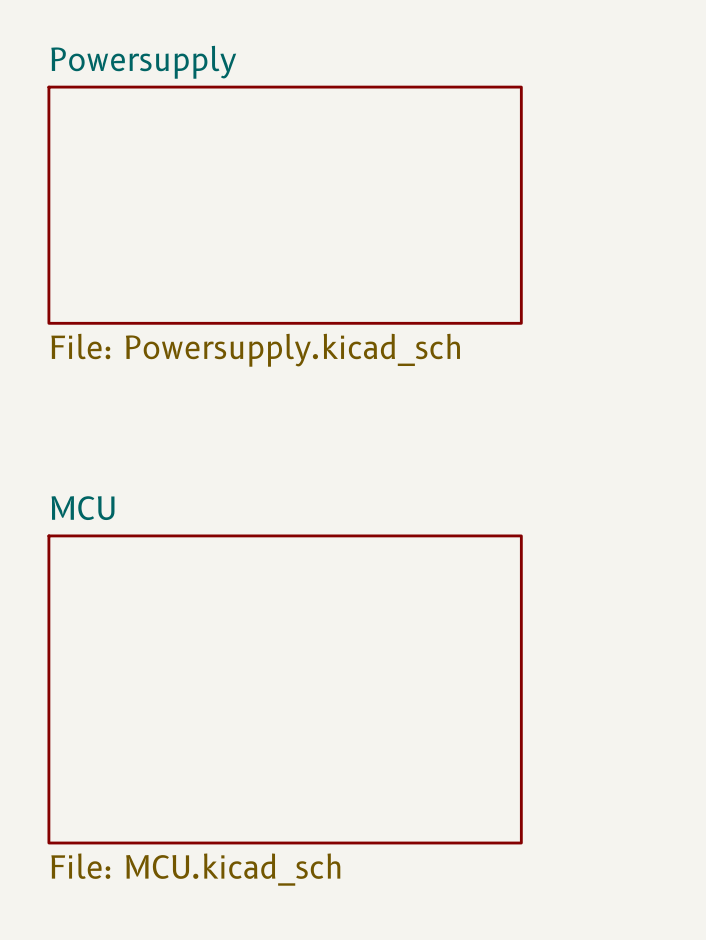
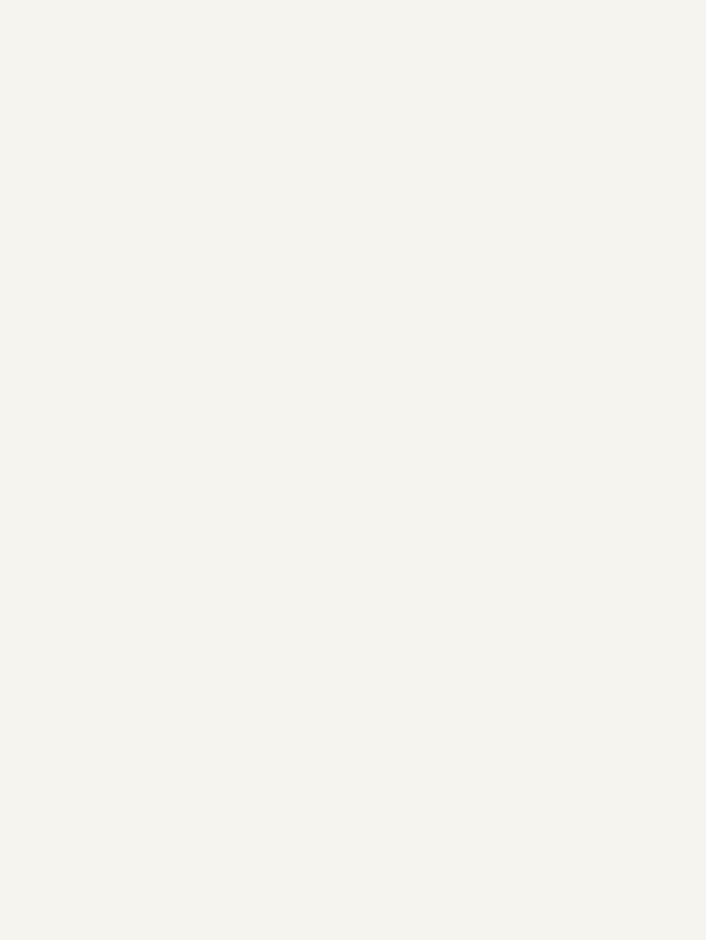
sheet Powersupply: File: Powersupply.kicad_sch (285, 205) -> none
sheet MCU: File: MCU.kicad_sch (285, 689) -> none

